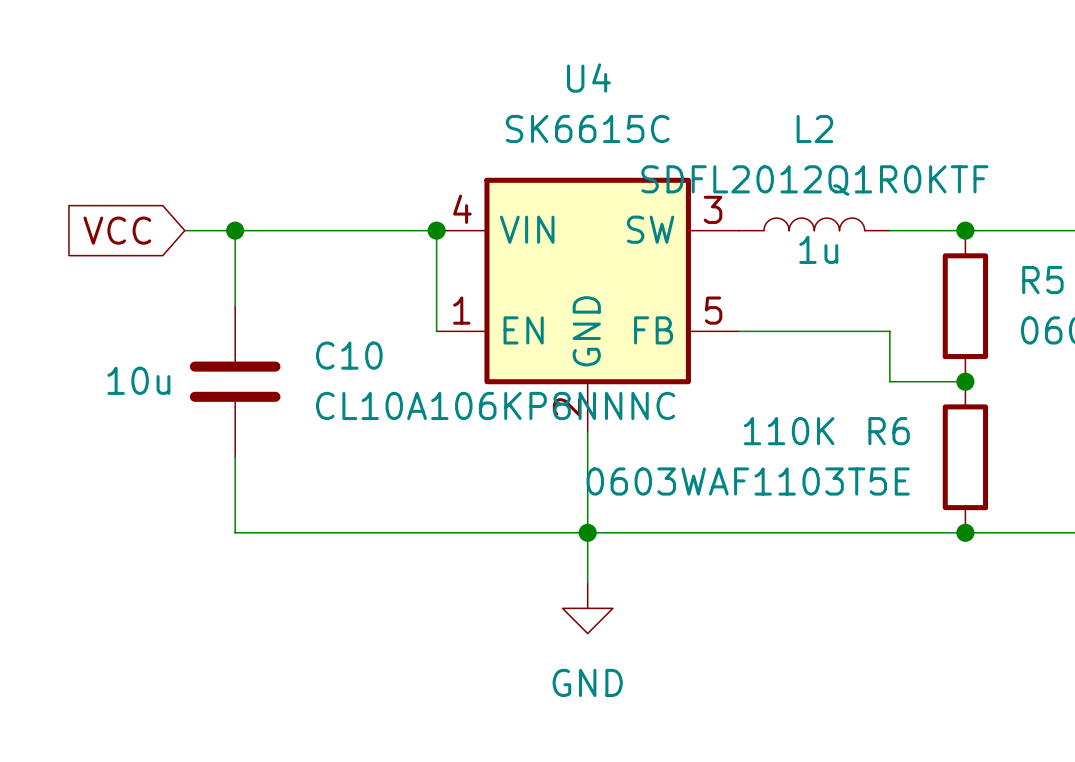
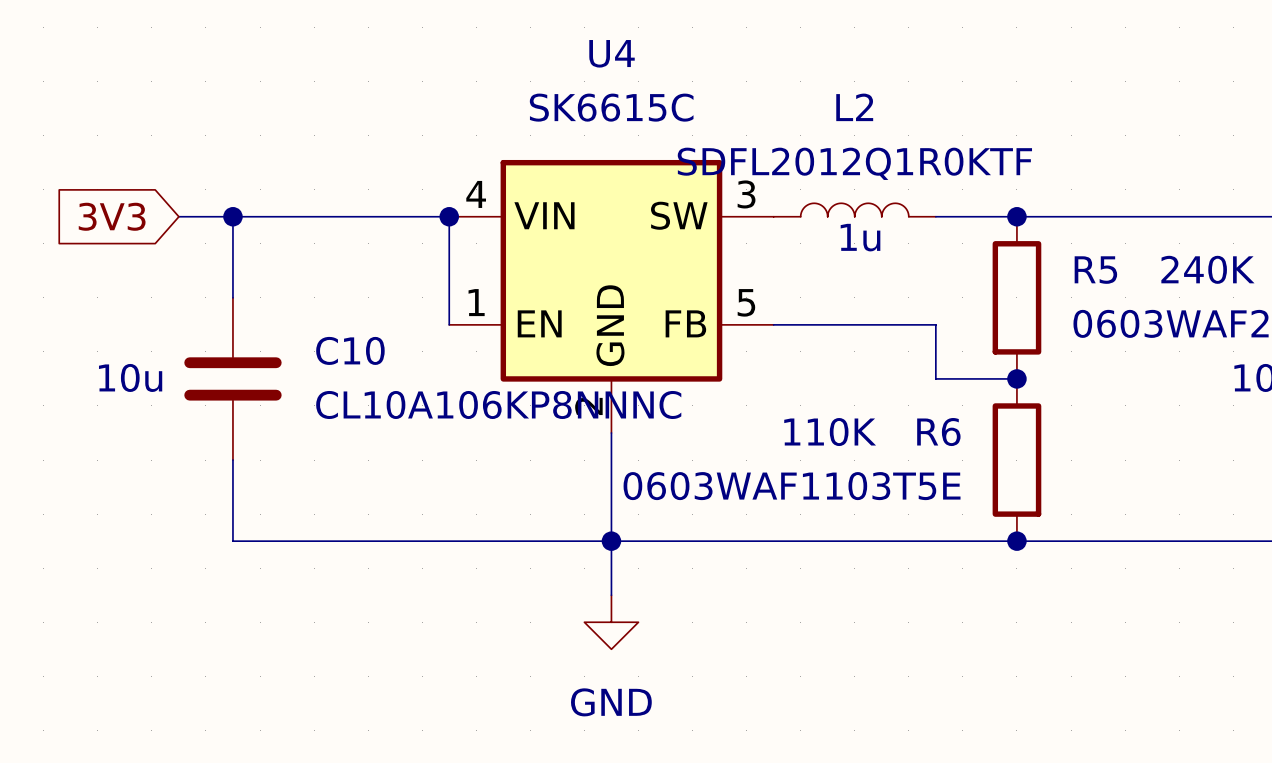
global label: VCC (117, 230) -> 3V3 (112, 216)

